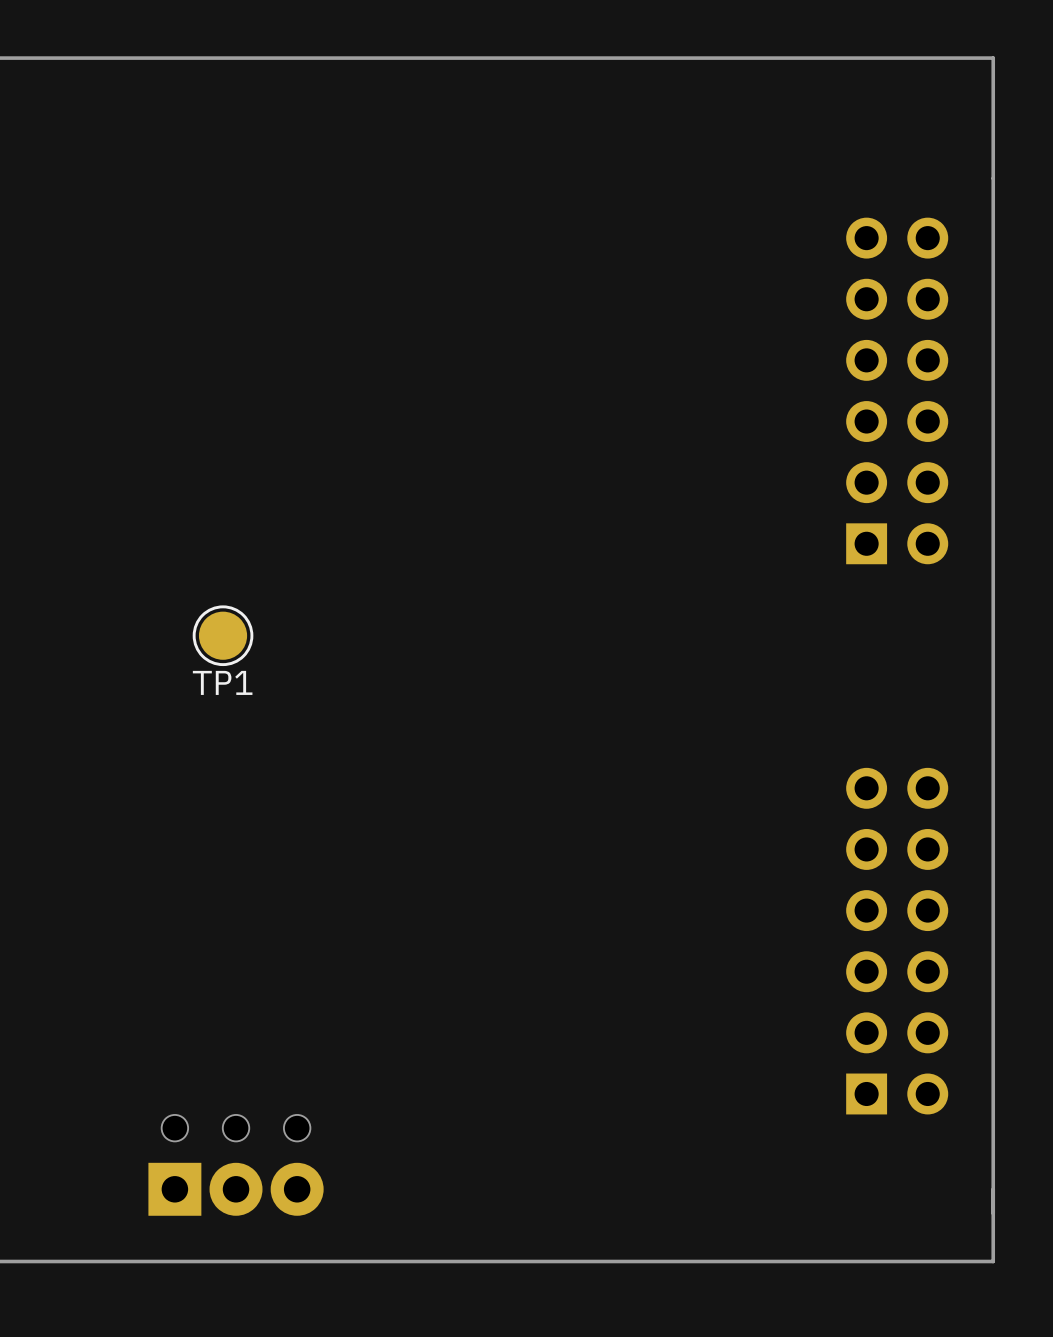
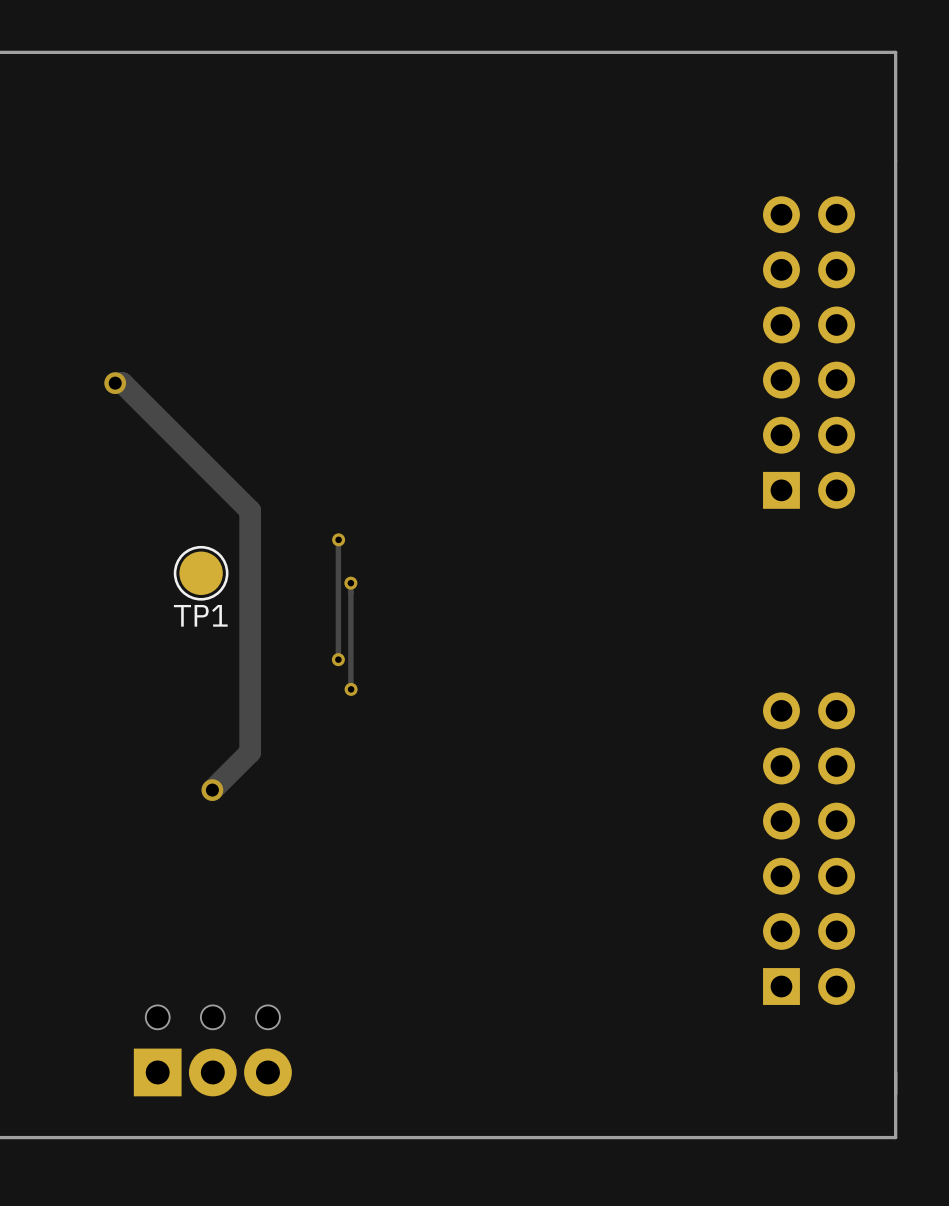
track: none -> (115, 383) (122, 383) (250, 510) (250, 752) (212, 790)
via: none -> (115, 383)
track: none -> (338, 540) (338, 659)
via: none -> (338, 539)
track: none -> (350, 583) (350, 689)
via: none -> (350, 583)
via: none -> (338, 659)
via: none -> (351, 689)
via: none -> (212, 790)

